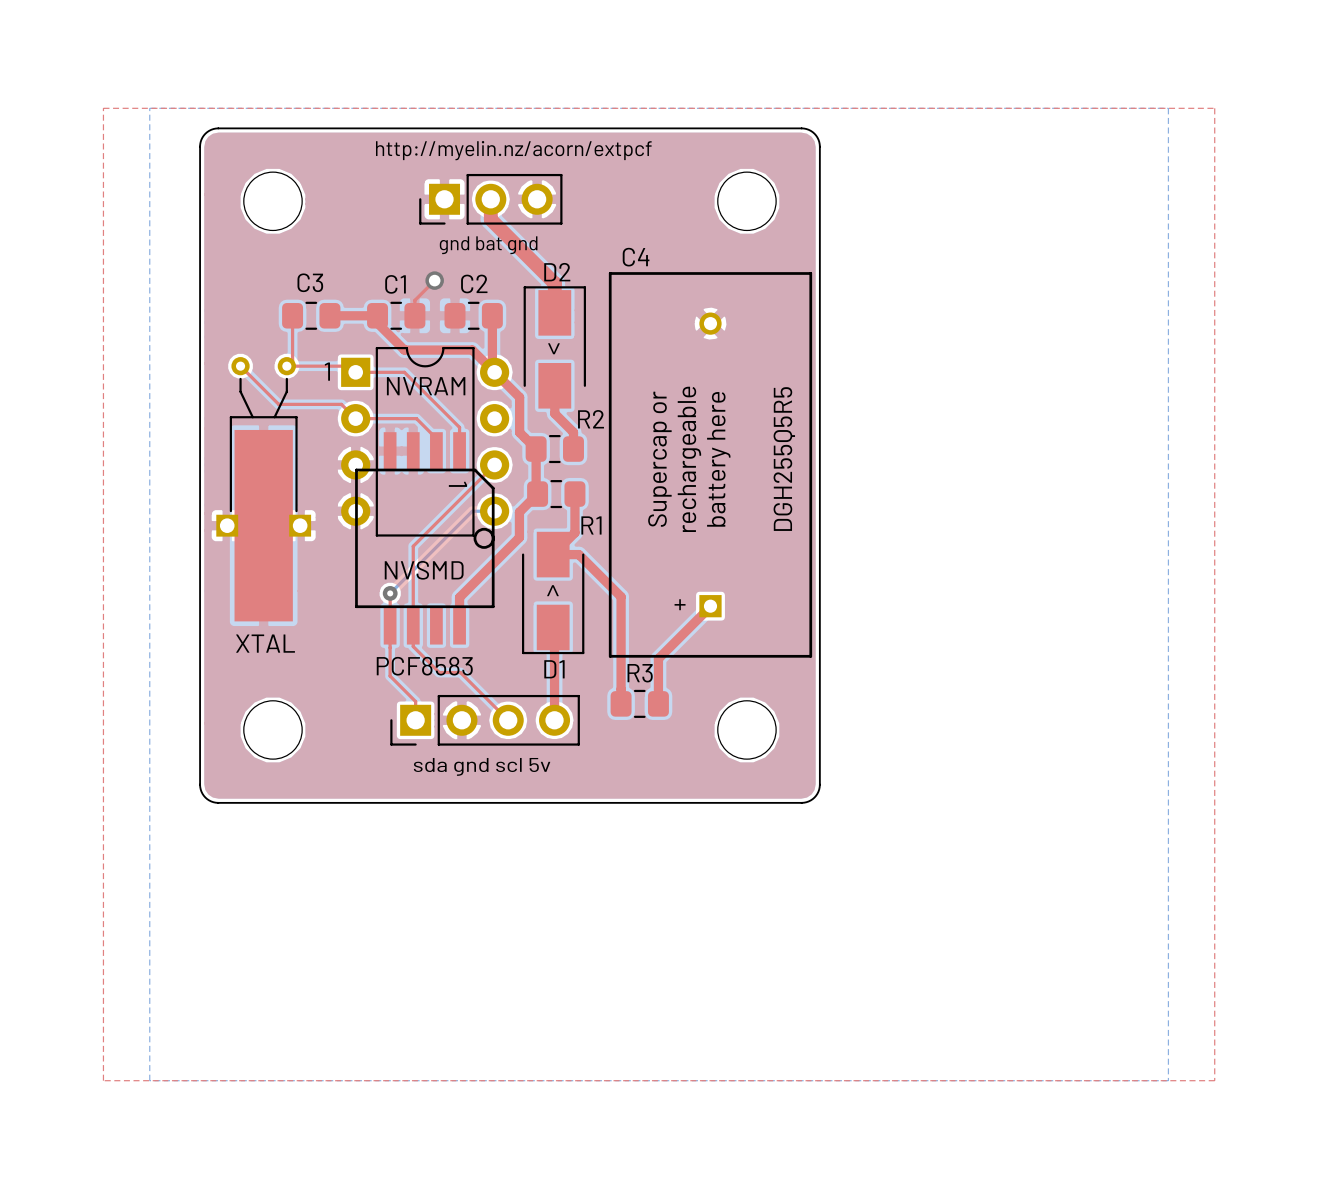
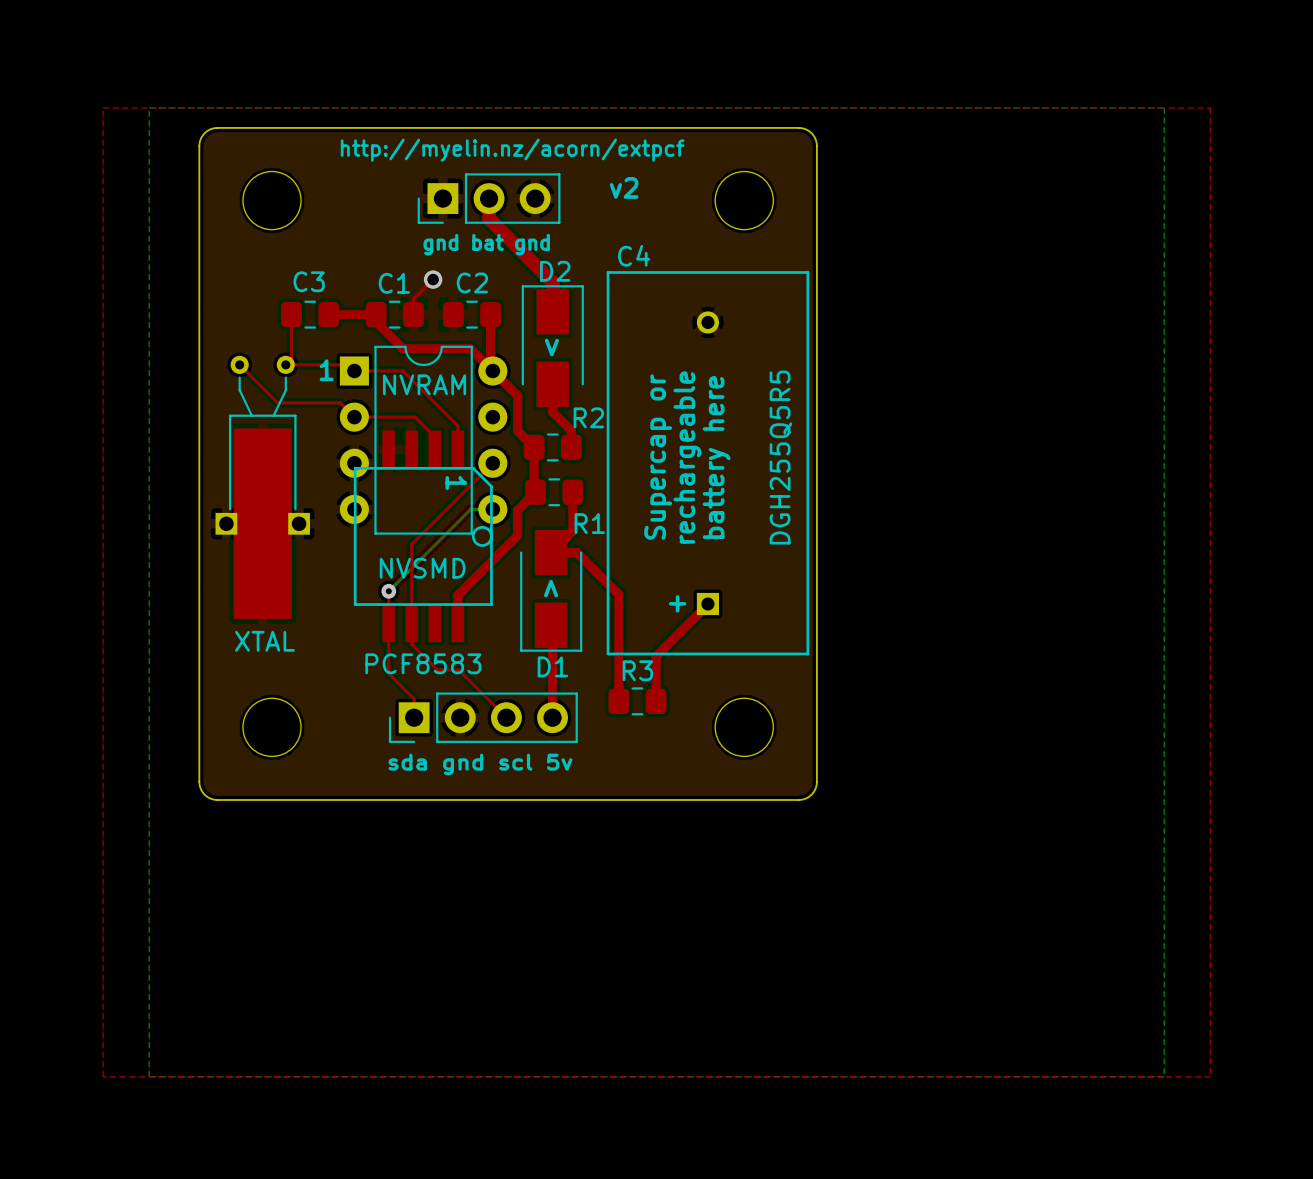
text: none -> v2 (624, 187)

